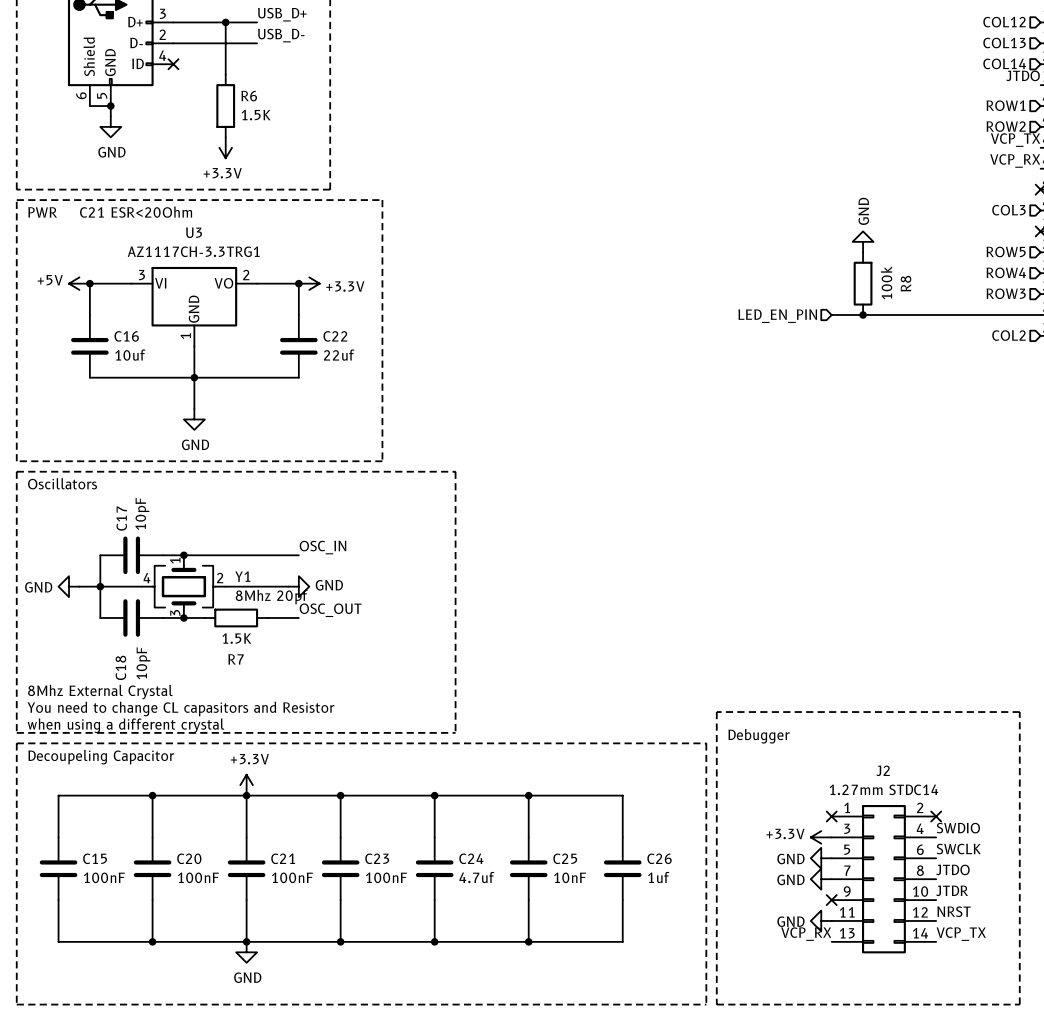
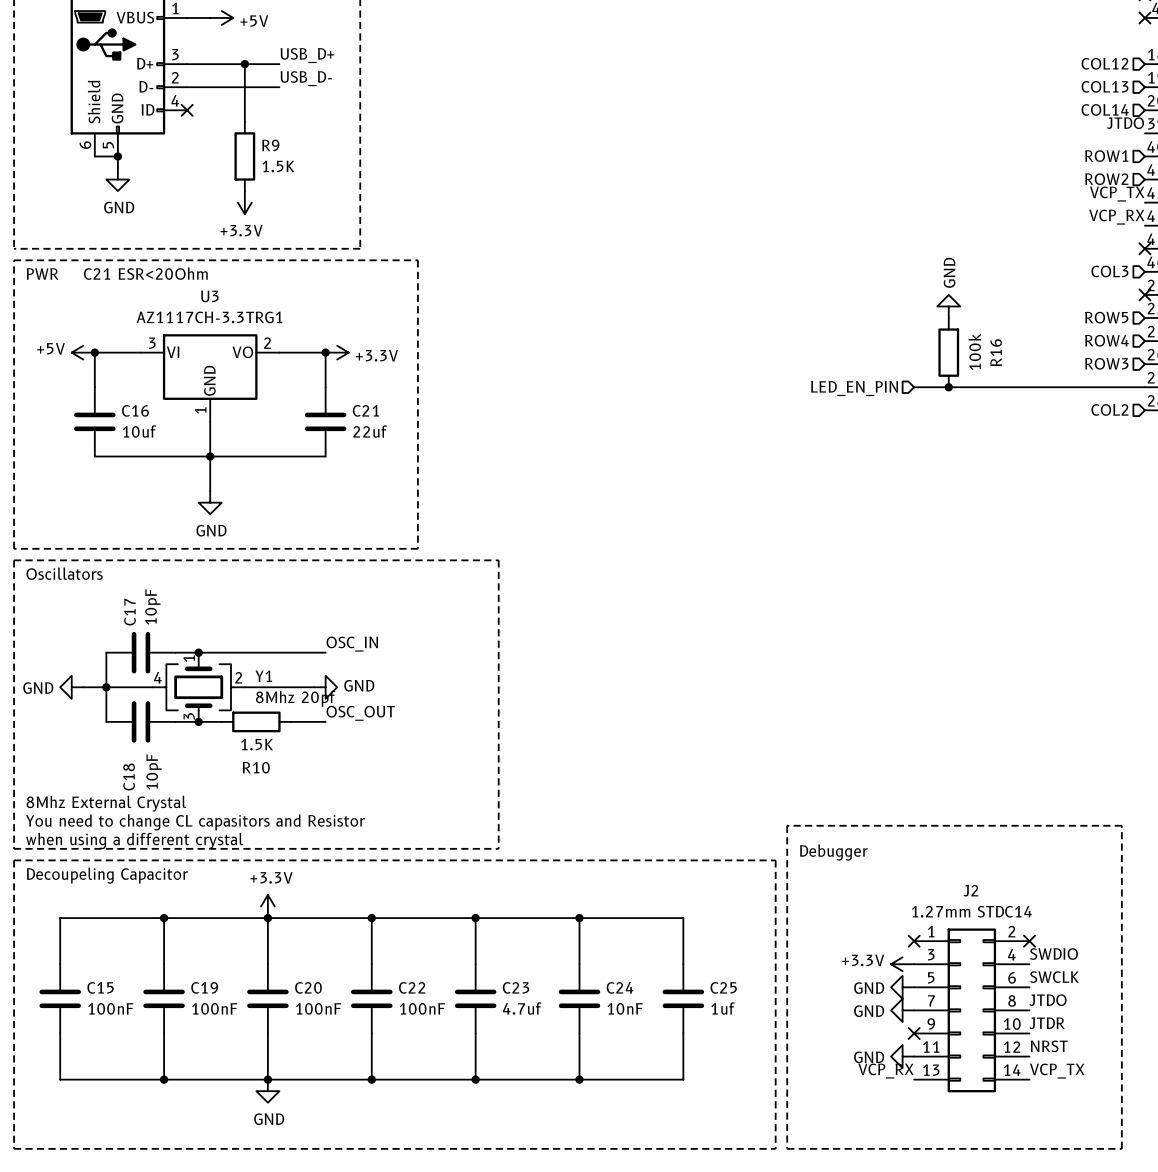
R6 name: R6 (249, 96) -> R9 (270, 145)
R8 name: R8 (905, 283) -> R16 (996, 352)
C22 name: C22 (335, 336) -> C21 (365, 410)
R7 name: R7 (236, 659) -> R10 (256, 767)
C20 name: C20 (189, 858) -> C19 (204, 987)
C21 name: C21 (283, 858) -> C20 (308, 987)
C23 name: C23 (377, 858) -> C22 (412, 987)
C24 name: C24 (471, 858) -> C23 (516, 987)
C25 name: C25 (565, 858) -> C24 (620, 987)
C26 name: C26 (659, 858) -> C25 (723, 987)

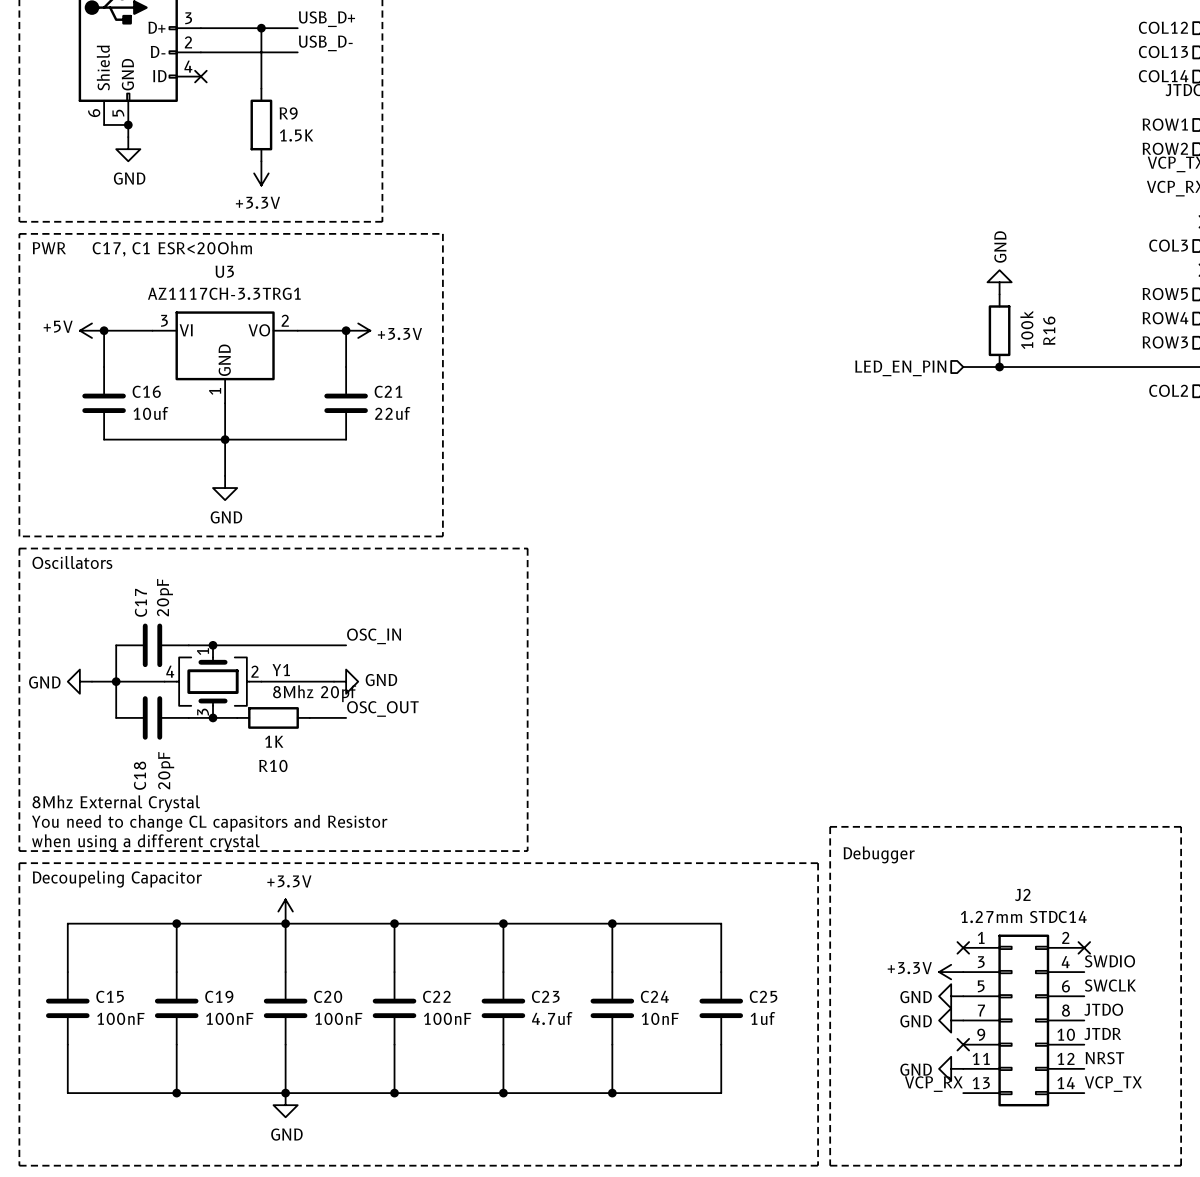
text: C21 ESR<20Ohm (145, 273) -> C17, C1 ESR<20Ohm (172, 248)
C17 value: 10pF (152, 606) -> 20pF (164, 597)
R10 value: 1.5K (257, 744) -> 1K (274, 741)
C18 value: 10pF (153, 772) -> 20pF (166, 770)

